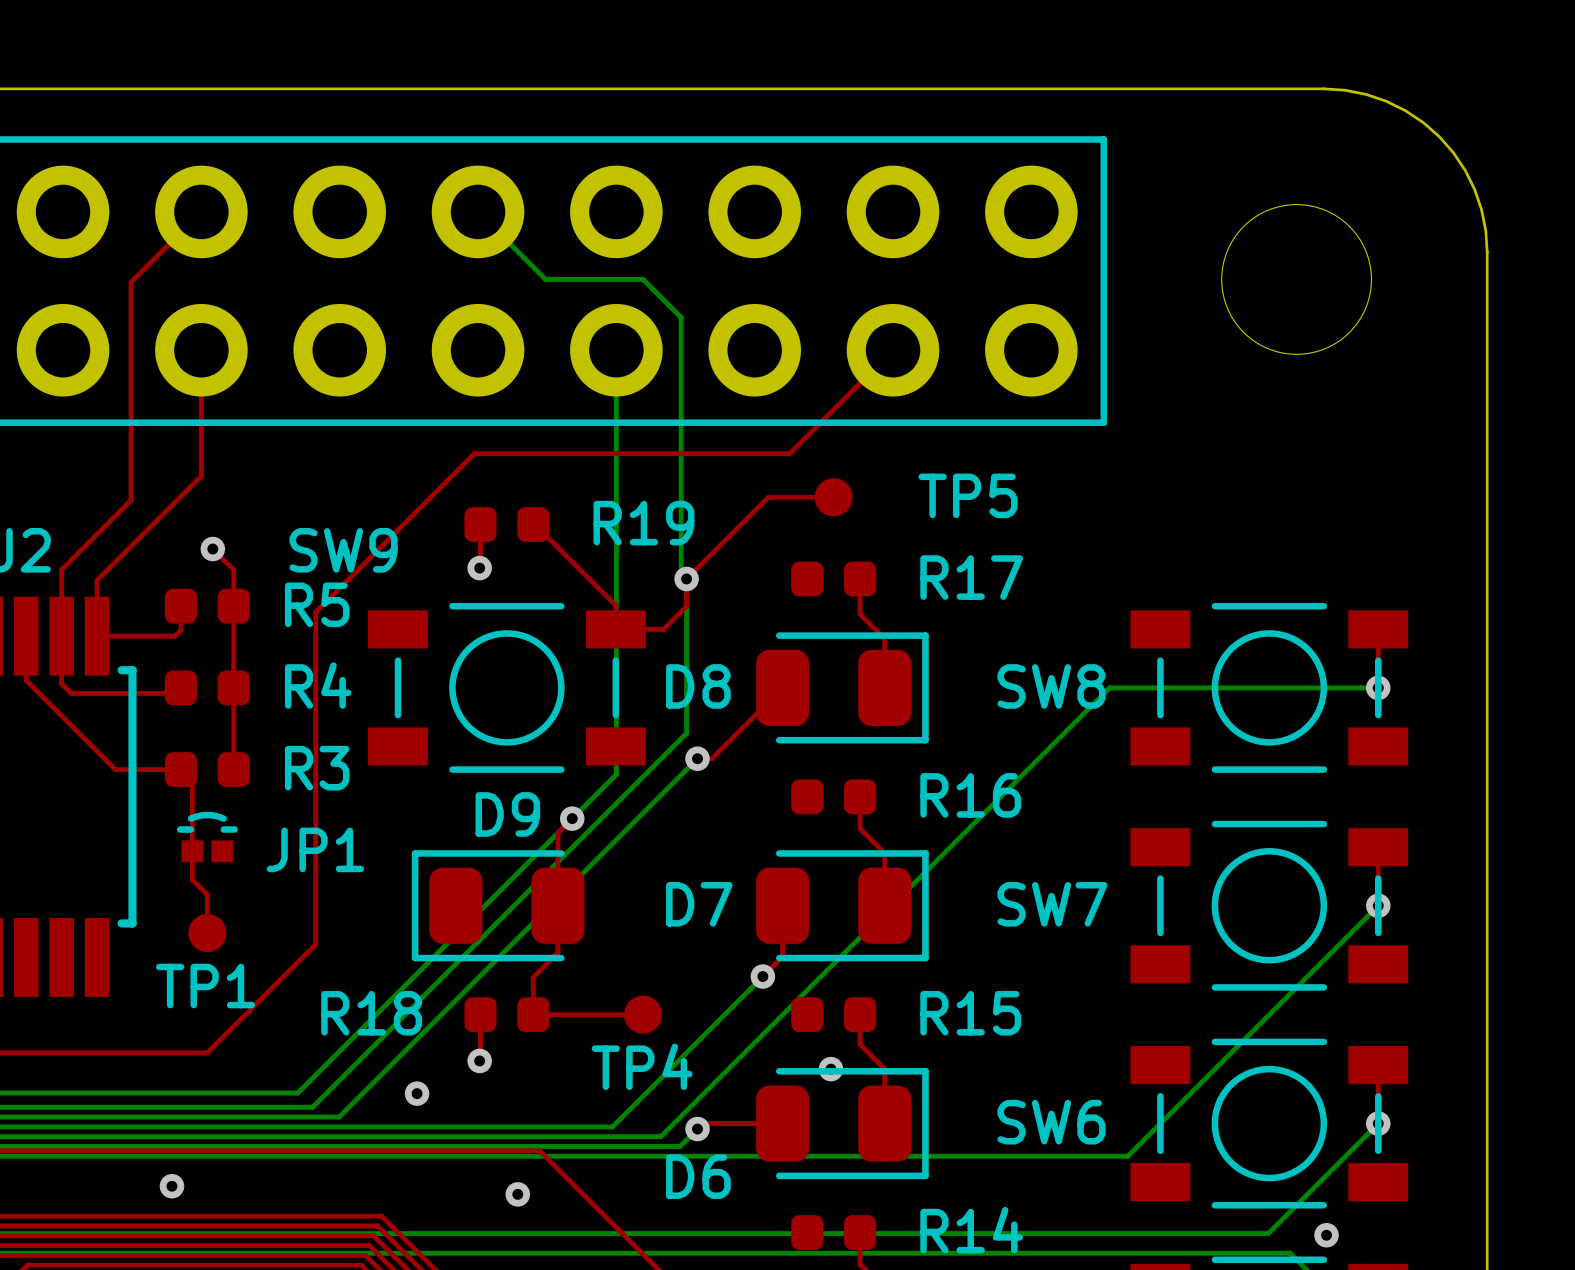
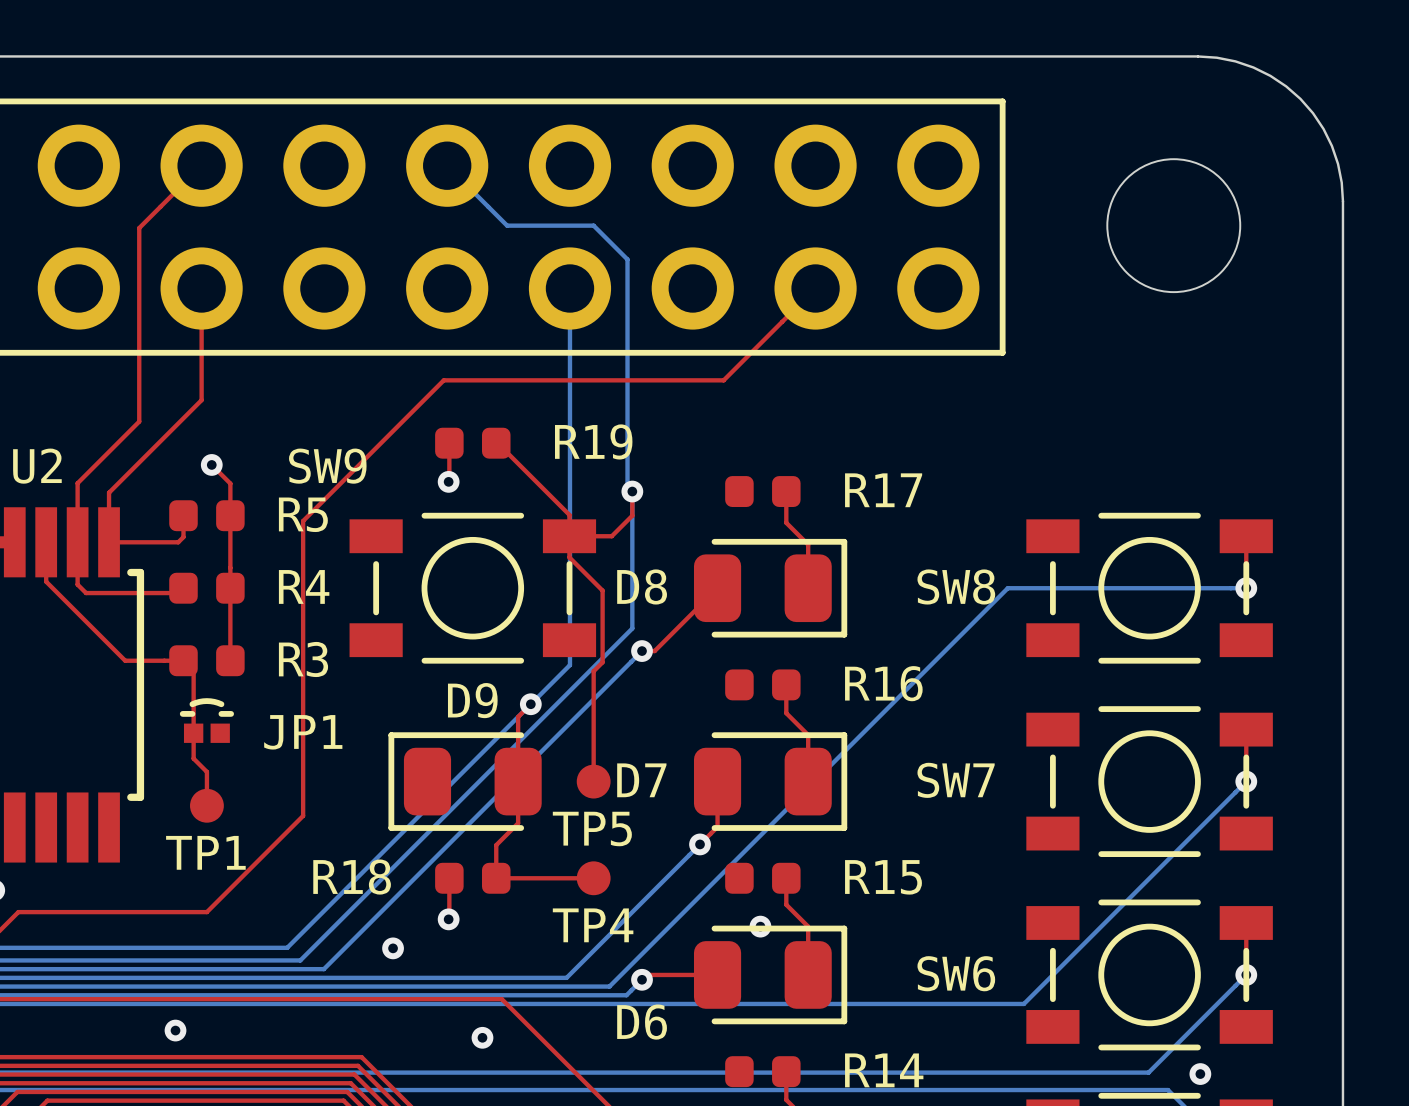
TP5 name position: TP5 (968, 495) -> TP5 (592, 828)
top track: (833, 497) (768, 497) (686, 578) -> none
TP5 position: (833, 497) -> (593, 781)
top track: none -> (569, 536) (569, 557) (602, 590) (602, 662) (593, 671) (593, 781)

